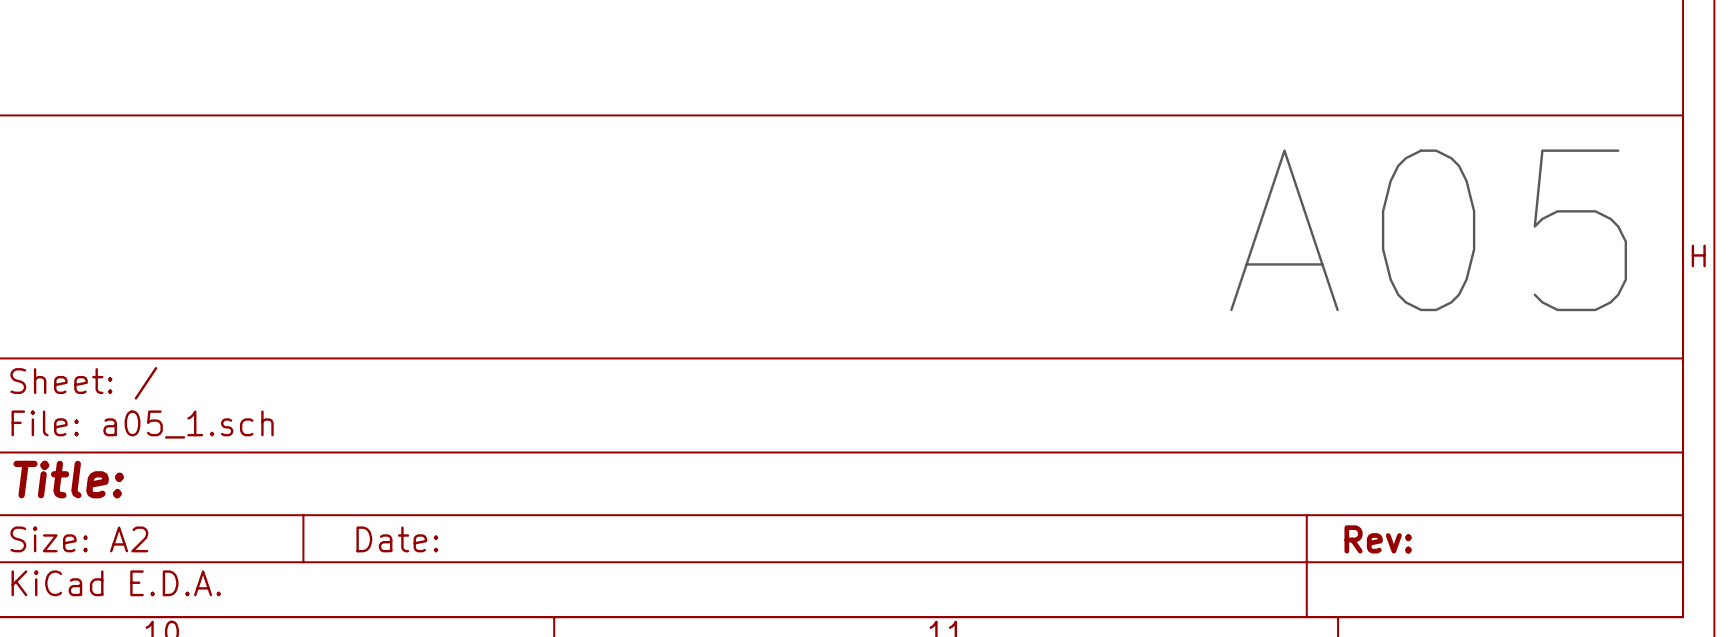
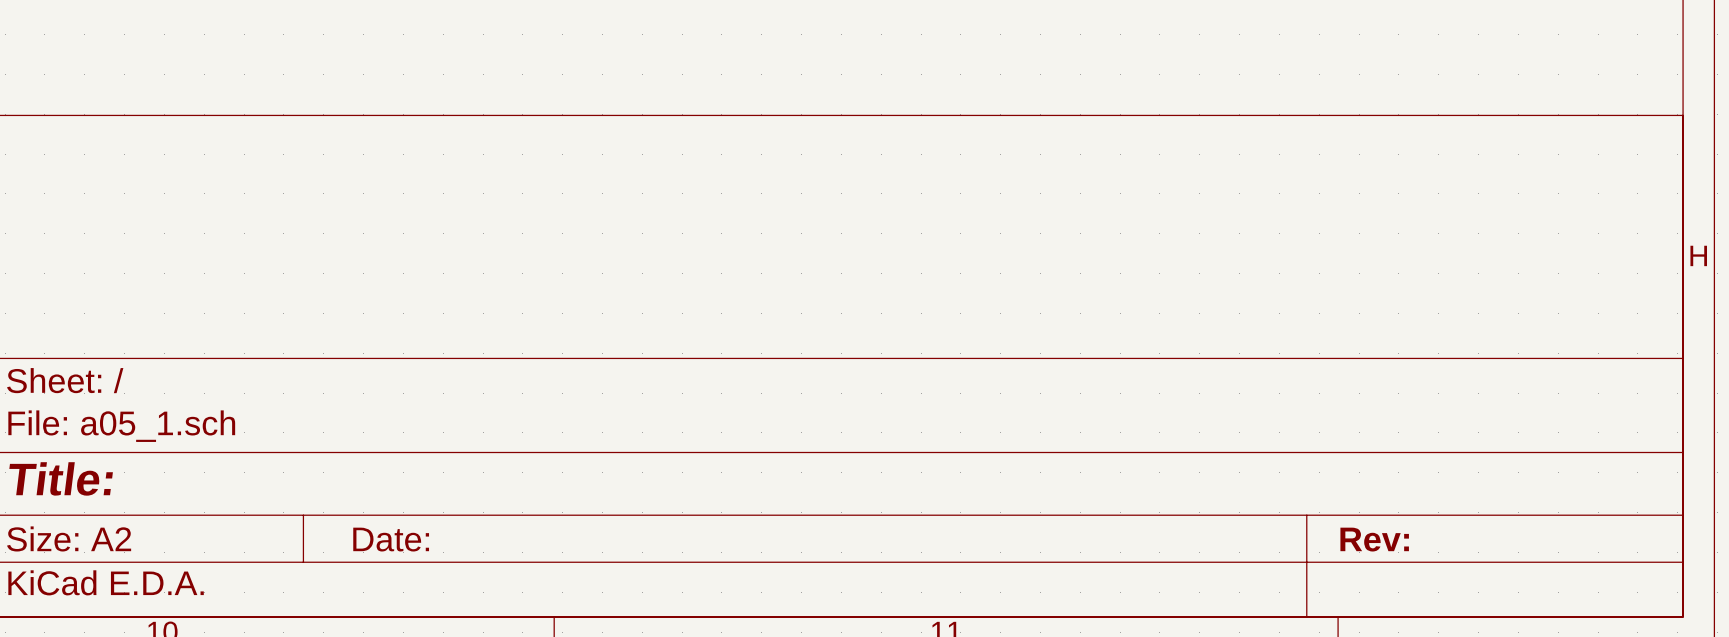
text: A05 (1428, 230) -> none

